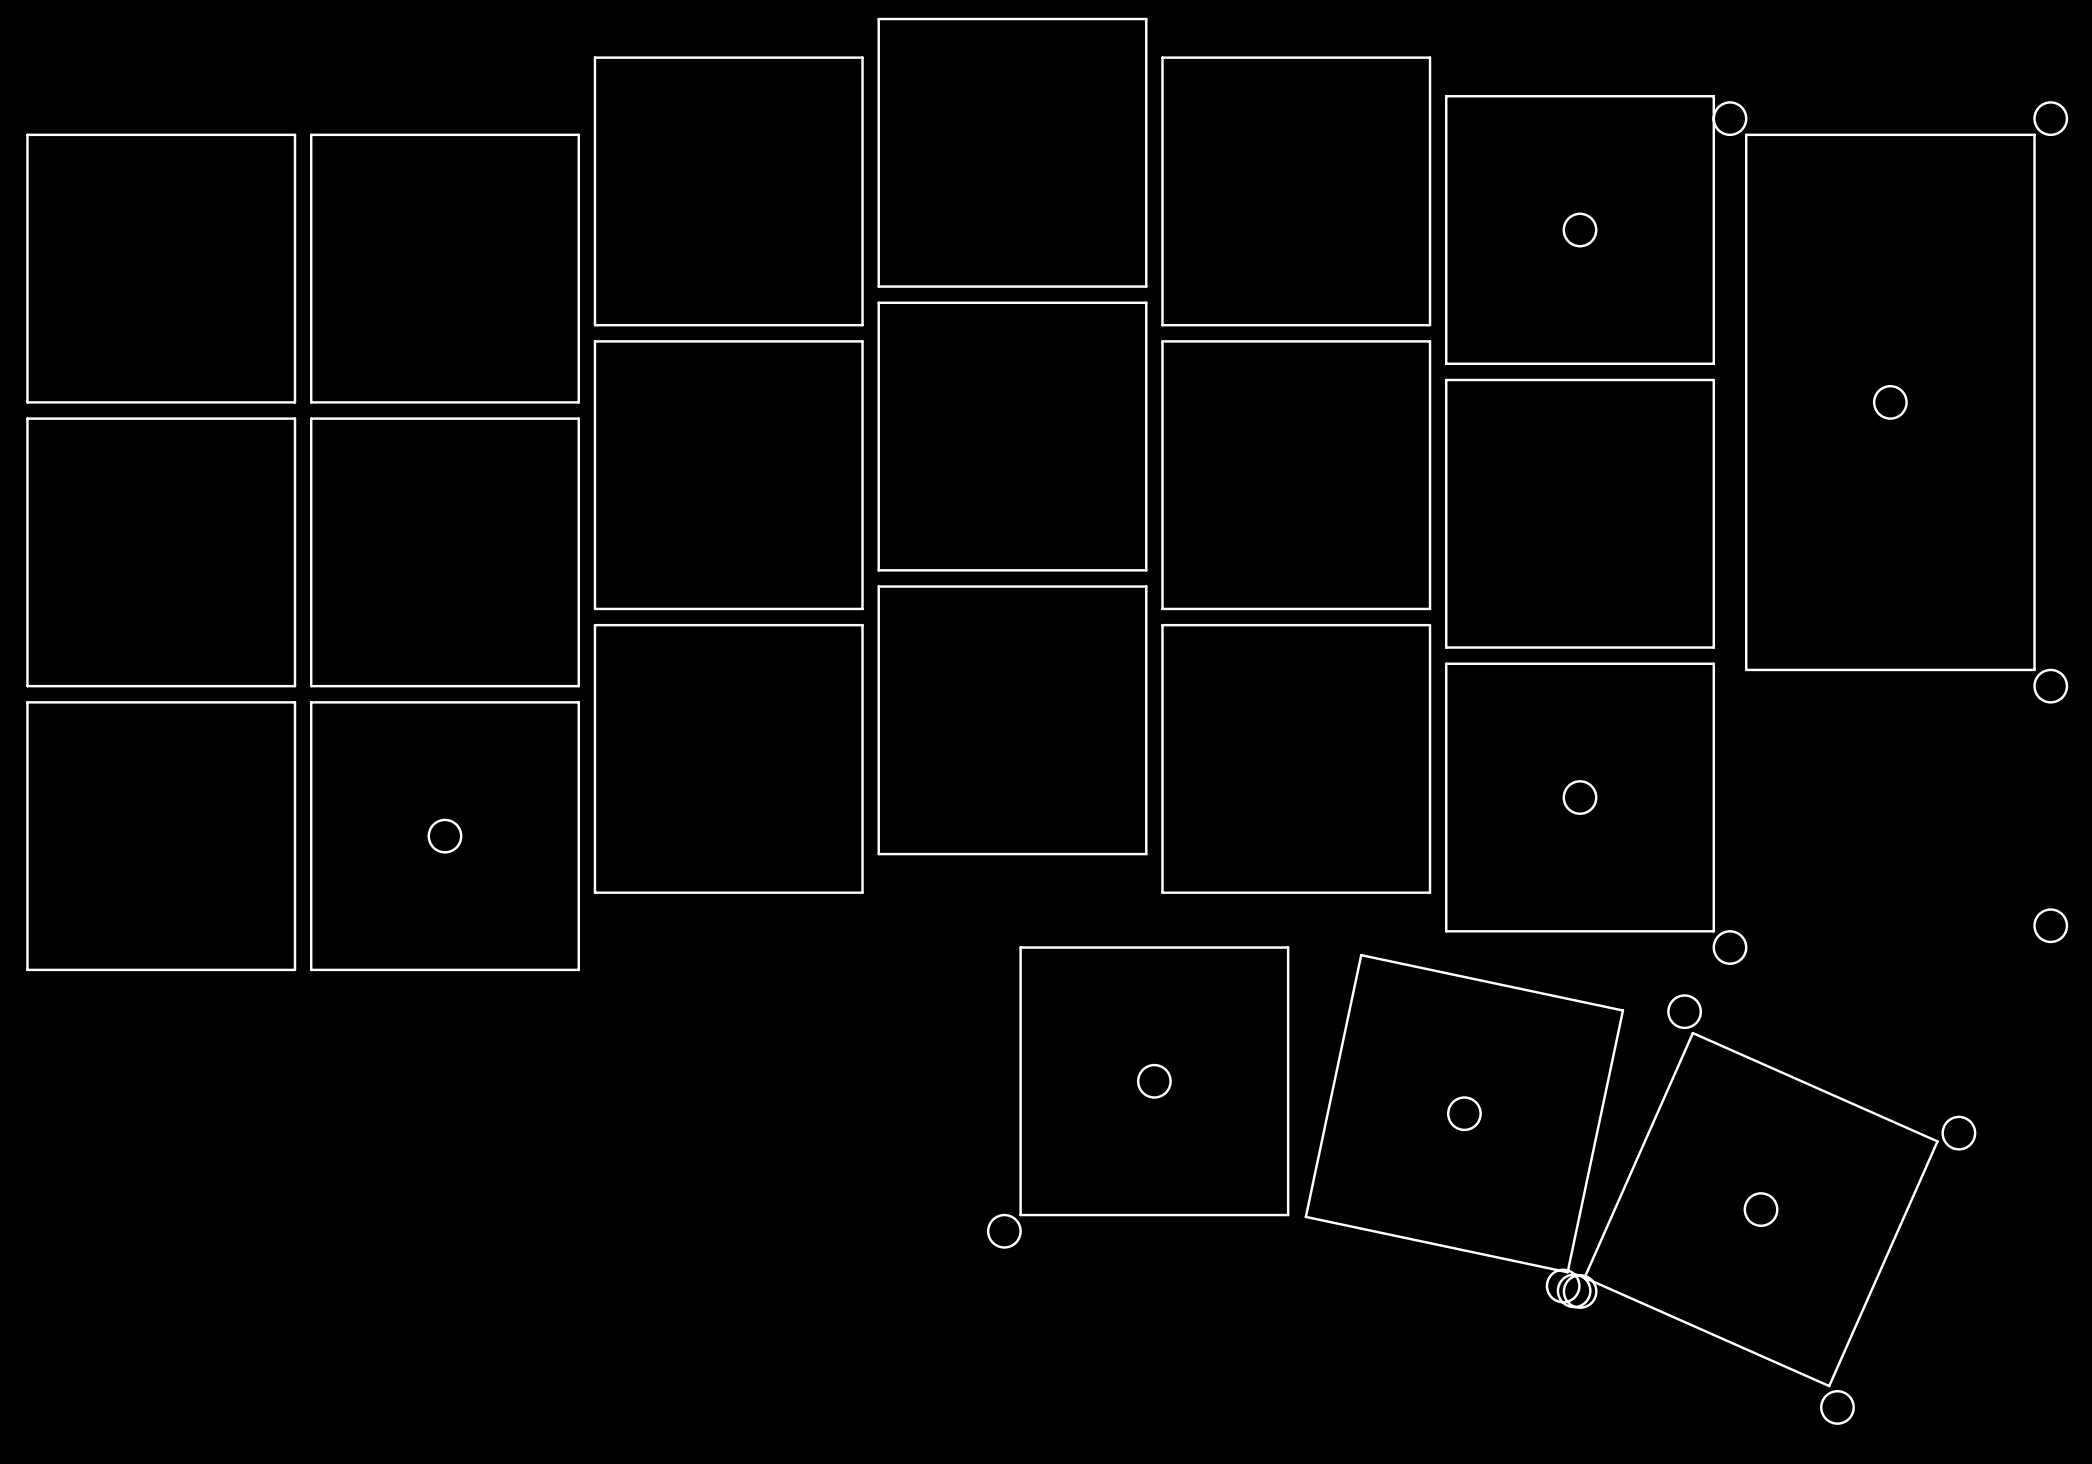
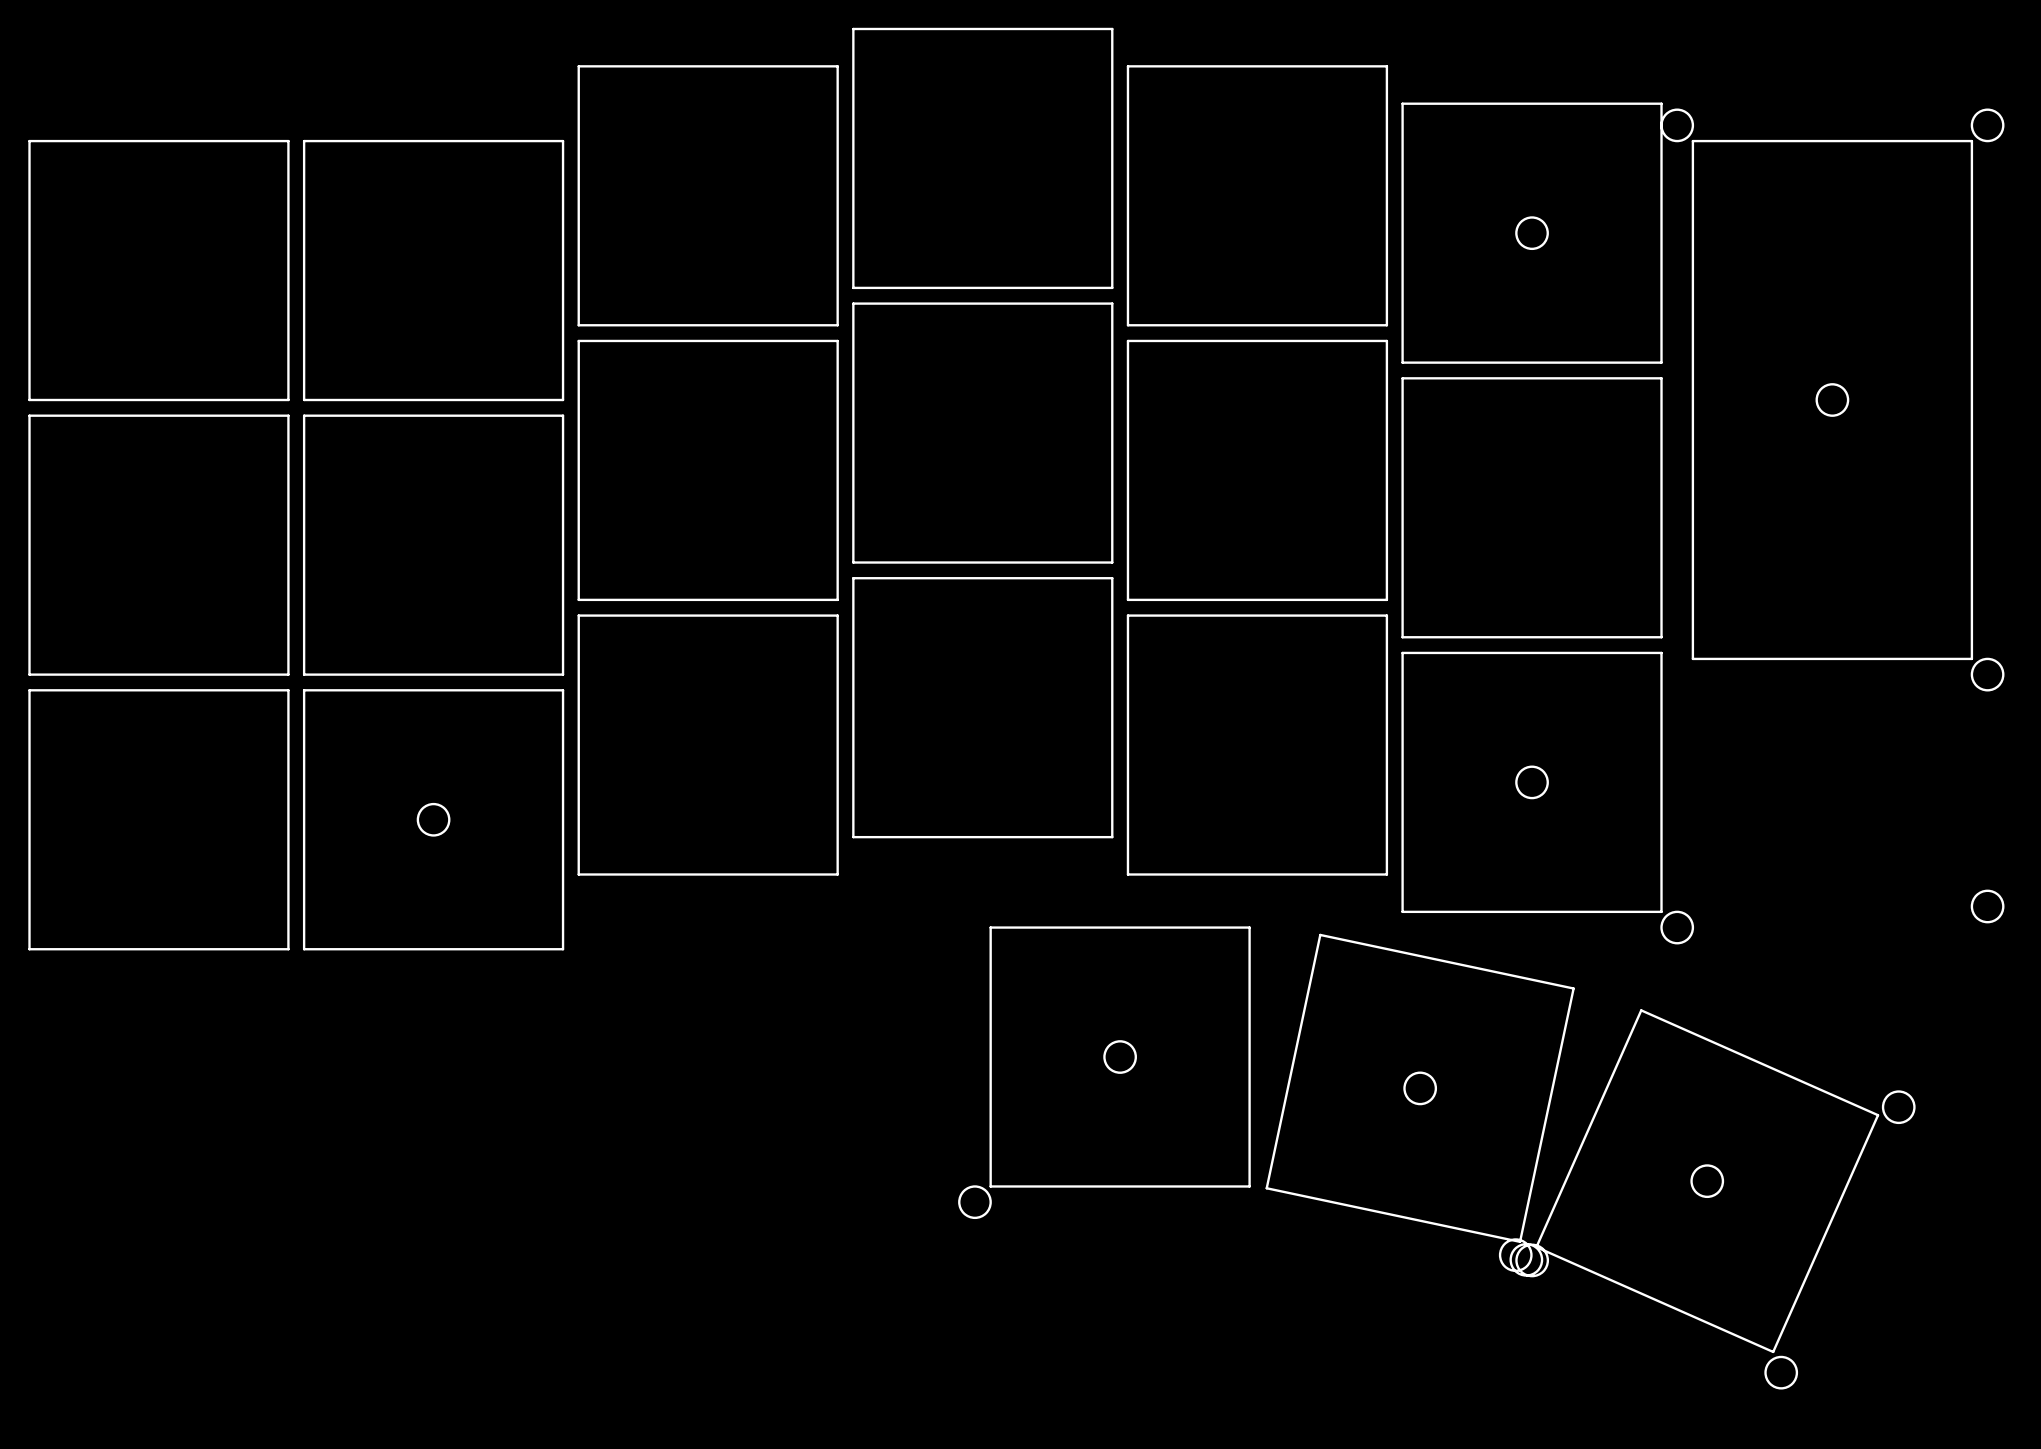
round board edge: [1667, 994, 1703, 1030] -> none

